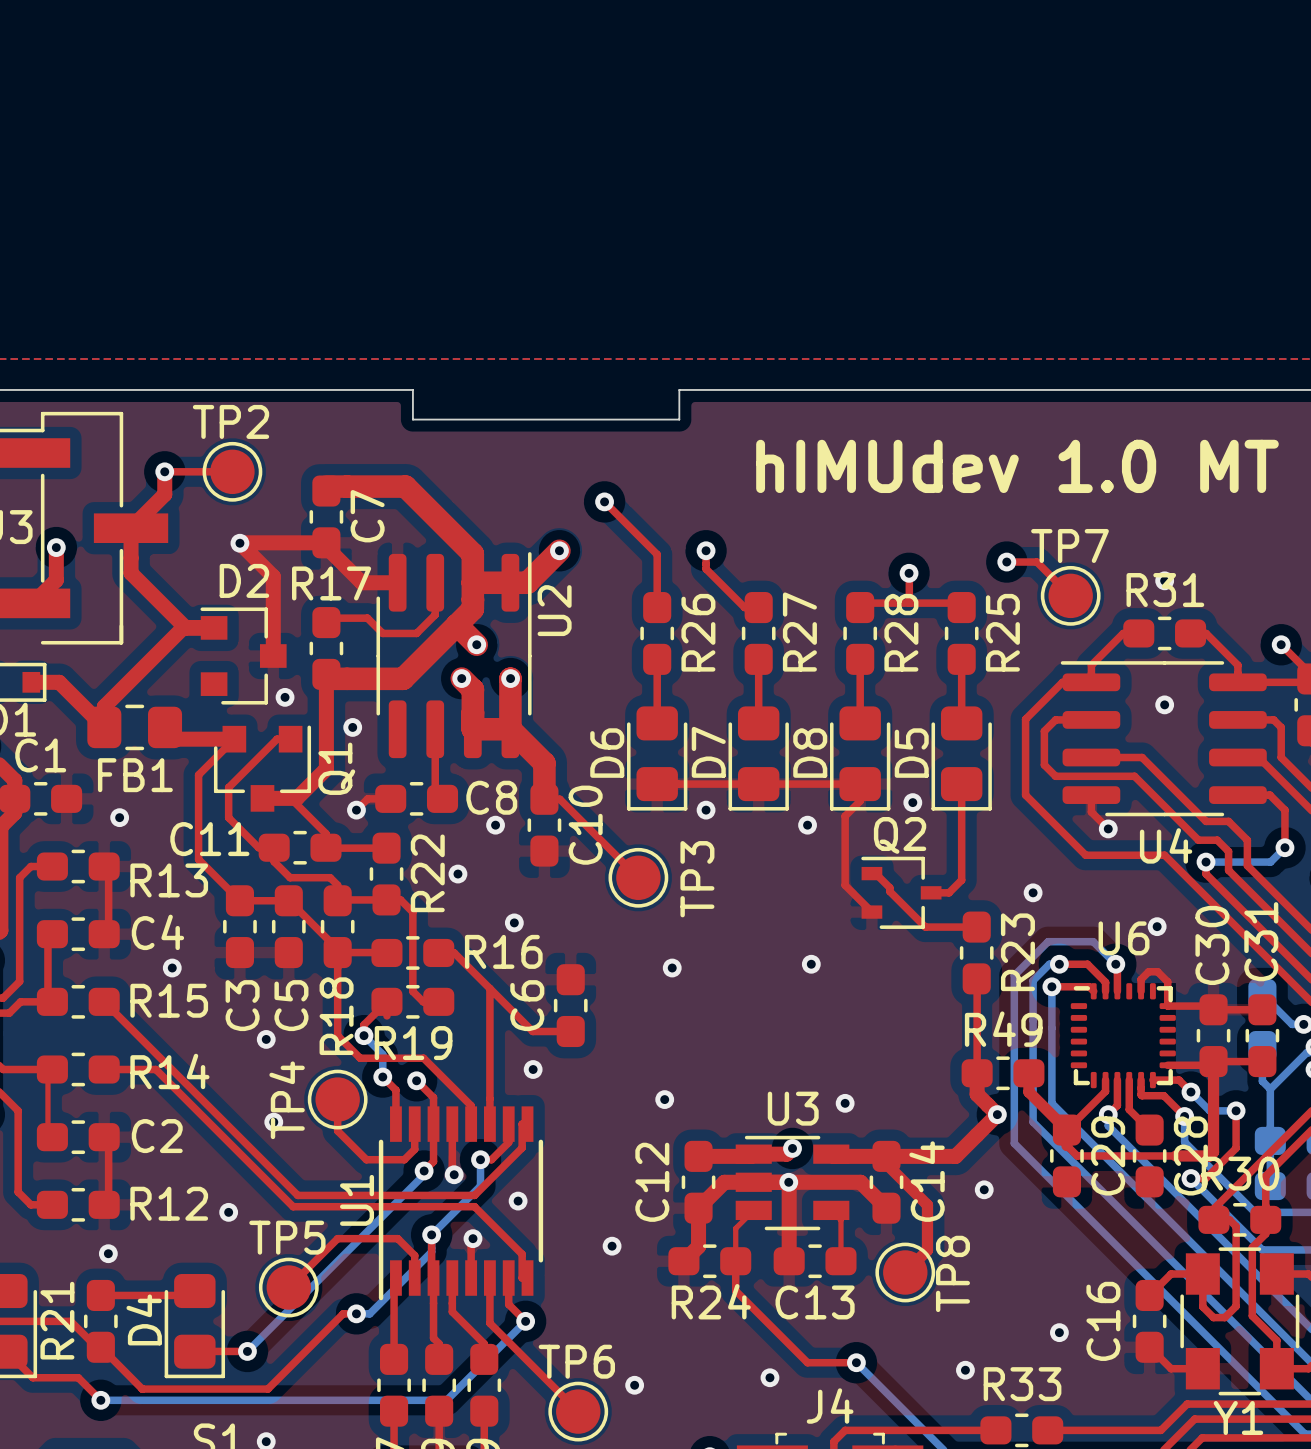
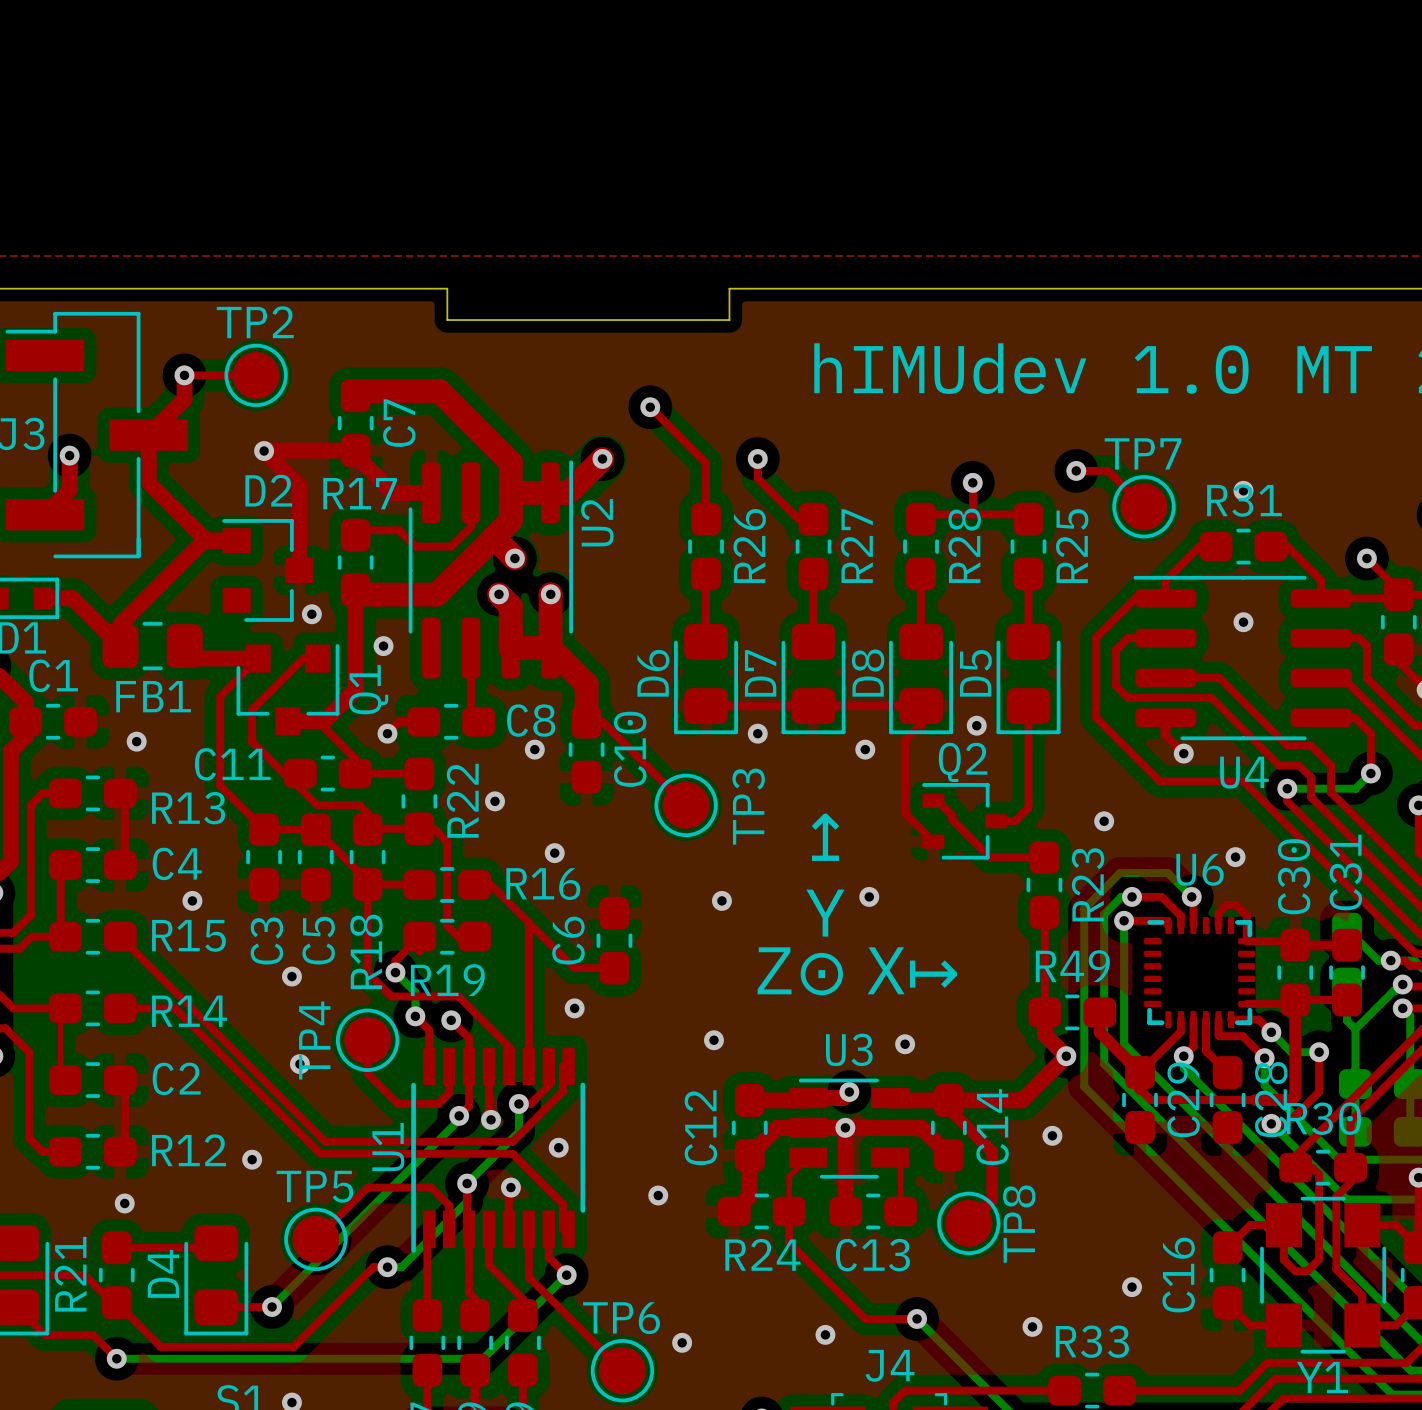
text: none -> ↥ (825, 837)
text: none -> Y (825, 913)
text: none -> Z⊙ (800, 971)
text: none -> X↦ (912, 970)

